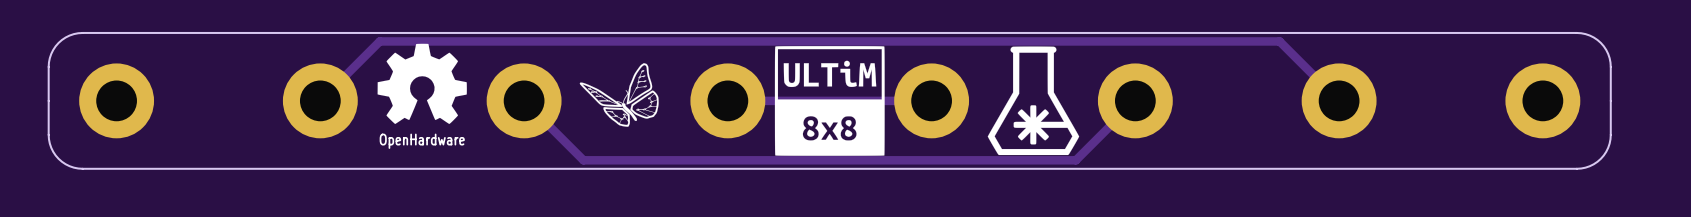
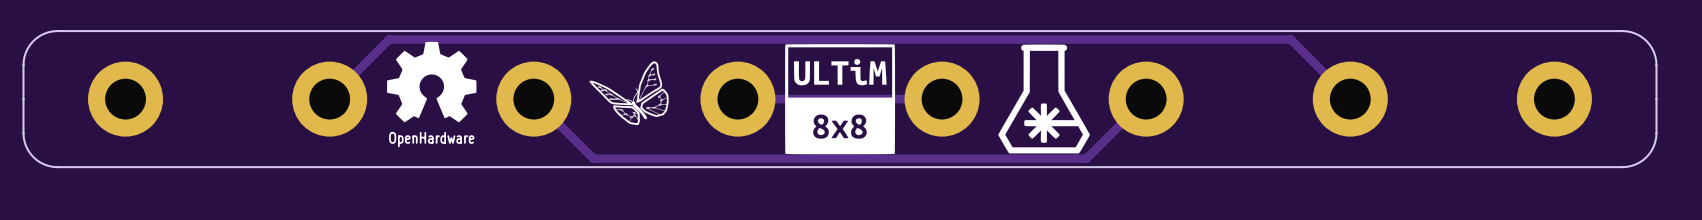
board edge: (82, 32) (69, 35) (58, 42) (51, 53) (48, 66) (49, 143) (53, 151) (61, 161) (69, 166) (82, 168) -> (91, 31) (53, 31) (40, 35) (28, 48) (23, 65) (23, 133) (28, 150) (36, 160) (48, 165) (91, 167)
board edge: (1576, 32) (1589, 35) (1600, 42) (1608, 53) (1610, 66) (1609, 143) (1606, 151) (1597, 161) (1585, 167) (1576, 168) -> (1588, 31) (1626, 31) (1639, 35) (1651, 48) (1656, 65) (1656, 133) (1651, 150) (1643, 160) (1631, 165) (1588, 167)

